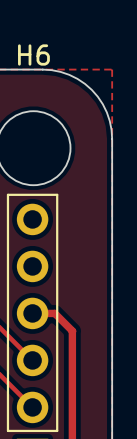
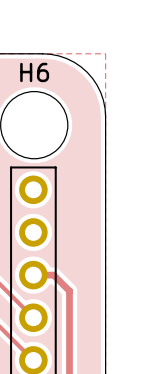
H6 name position: H6 (33, 55) -> H6 (34, 72)

